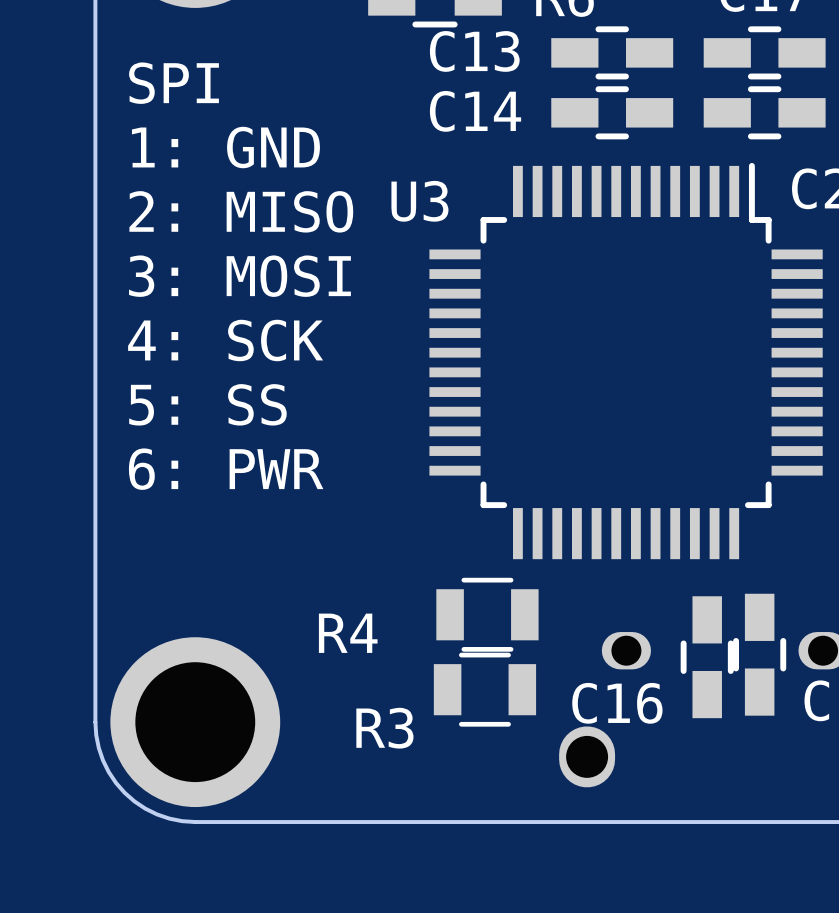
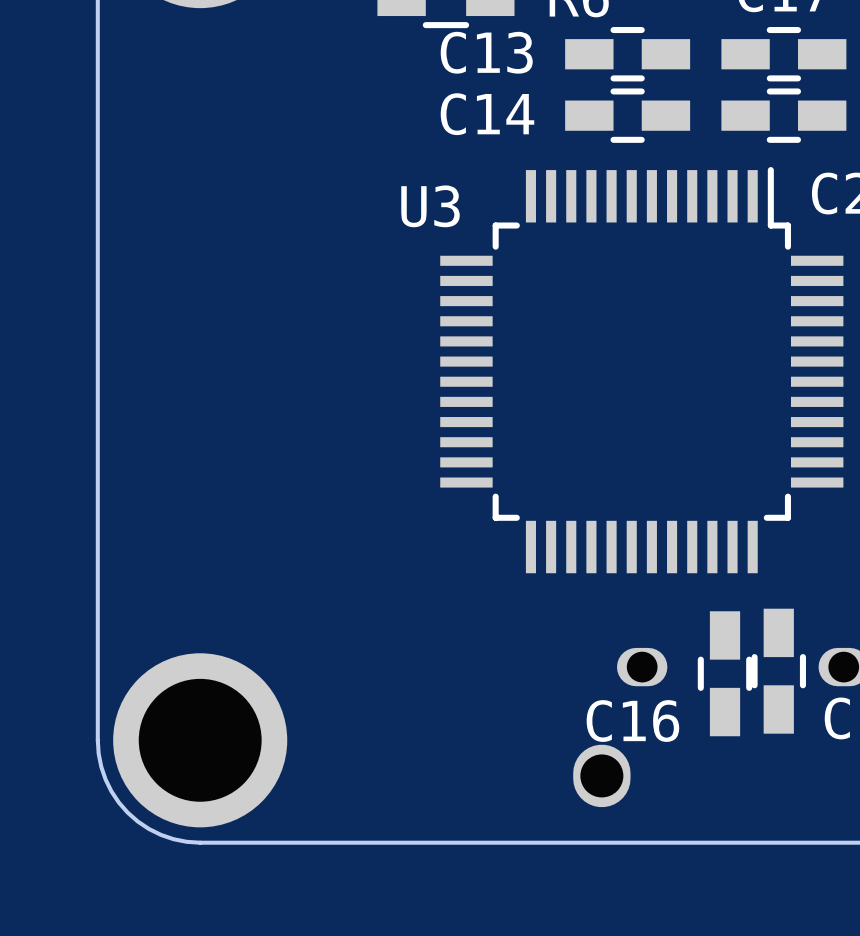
text: SPI (174, 83) -> none
text: 1: GND (225, 147) -> none
text: 2: MISO (241, 211) -> none
text: 3: MOSI (239, 276) -> none
text: 4: SCK (225, 340) -> none
text: 5: SS (207, 404) -> none
text: 6: PWR (226, 469) -> none
R4: (487, 614) -> none
R3: (484, 689) -> none

